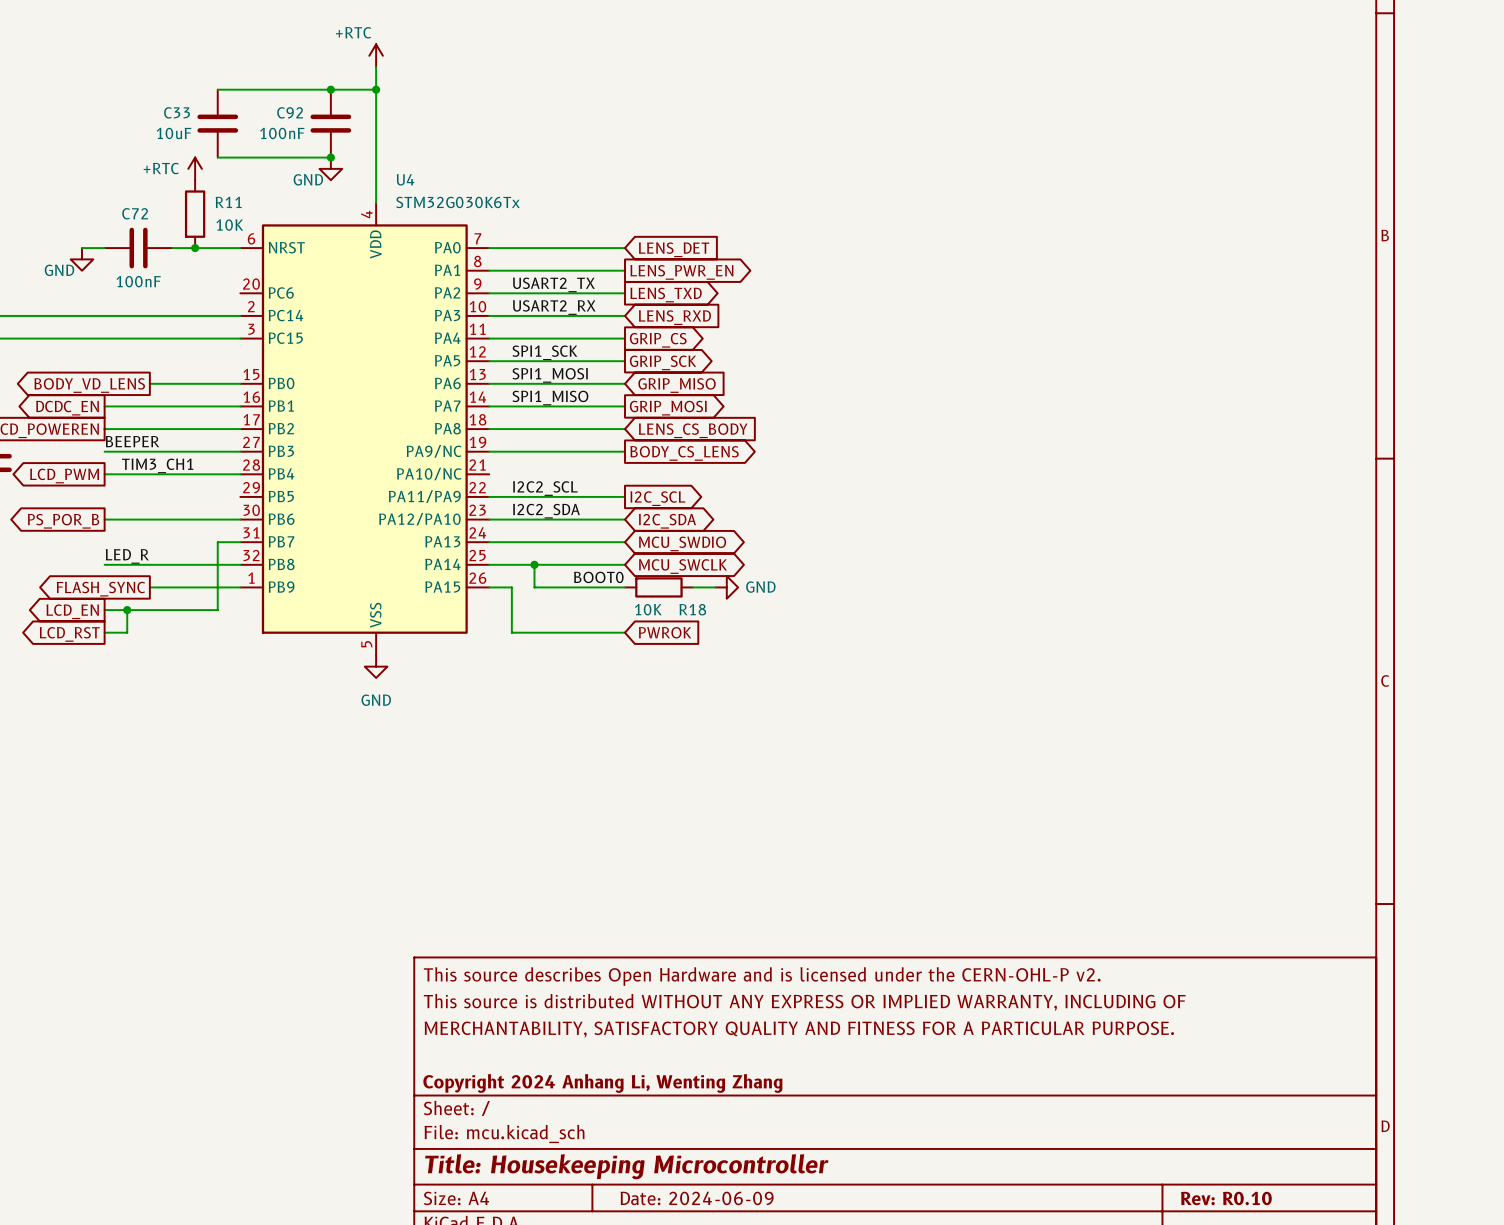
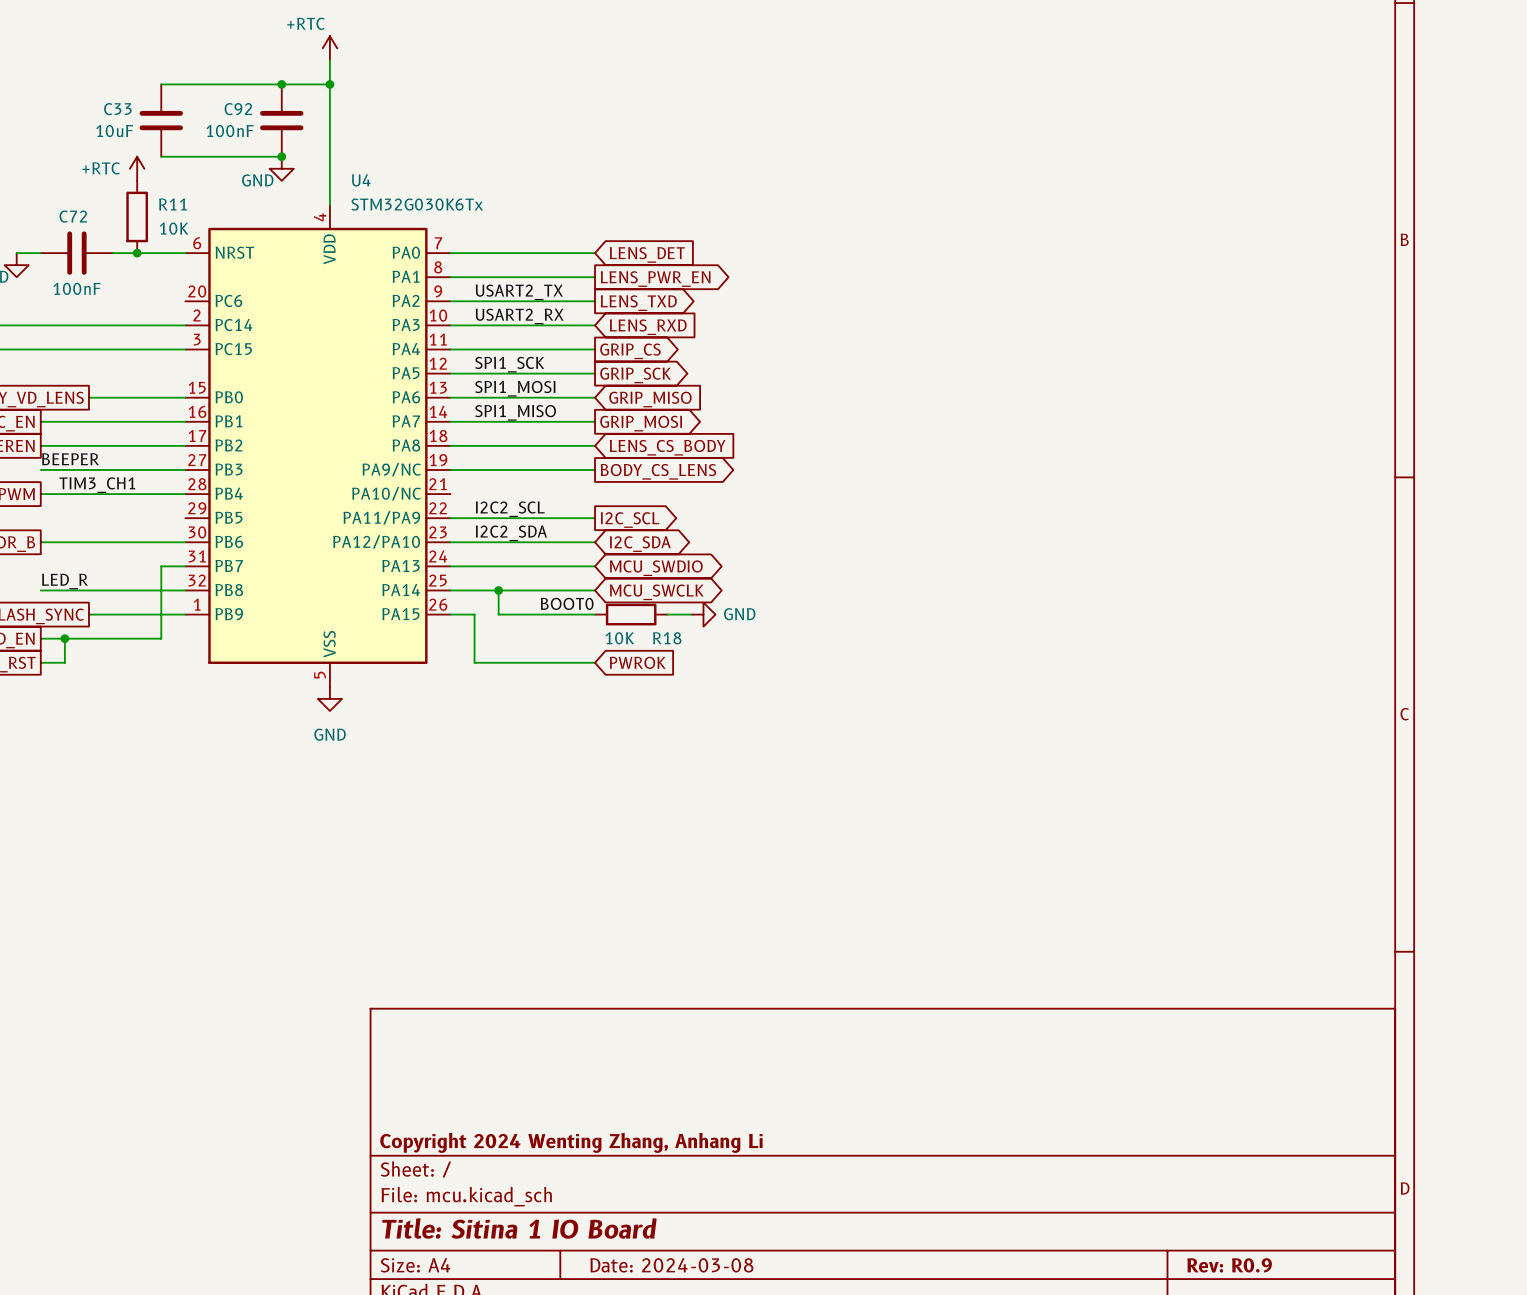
title block: This source describes Open Hardware and is licensed under the CERN-OHL-P v2. (762, 976) -> none
title block: This source is distributed WITHOUT ANY EXPRESS OR IMPLIED WARRANTY, INCLUDING OF (804, 1002) -> none
title block: MERCHANTABILITY, SATISFACTORY QUALITY AND FITNESS FOR A PARTICULAR PURPOSE. (799, 1029) -> none
title block: Copyright 2024 Anhang Li, Wenting Zhang (602, 1083) -> Copyright 2024 Wenting Zhang, Anhang Li (571, 1142)
title block: Title: Housekeeping Microcontroller (626, 1166) -> Title: Sitina 1 IO Board (519, 1228)
title block: Date: 2024-06-09 (697, 1198) -> Date: 2024-03-08 (671, 1265)
title block: Rev: R0.10 (1226, 1198) -> Rev: R0.9 (1229, 1265)

